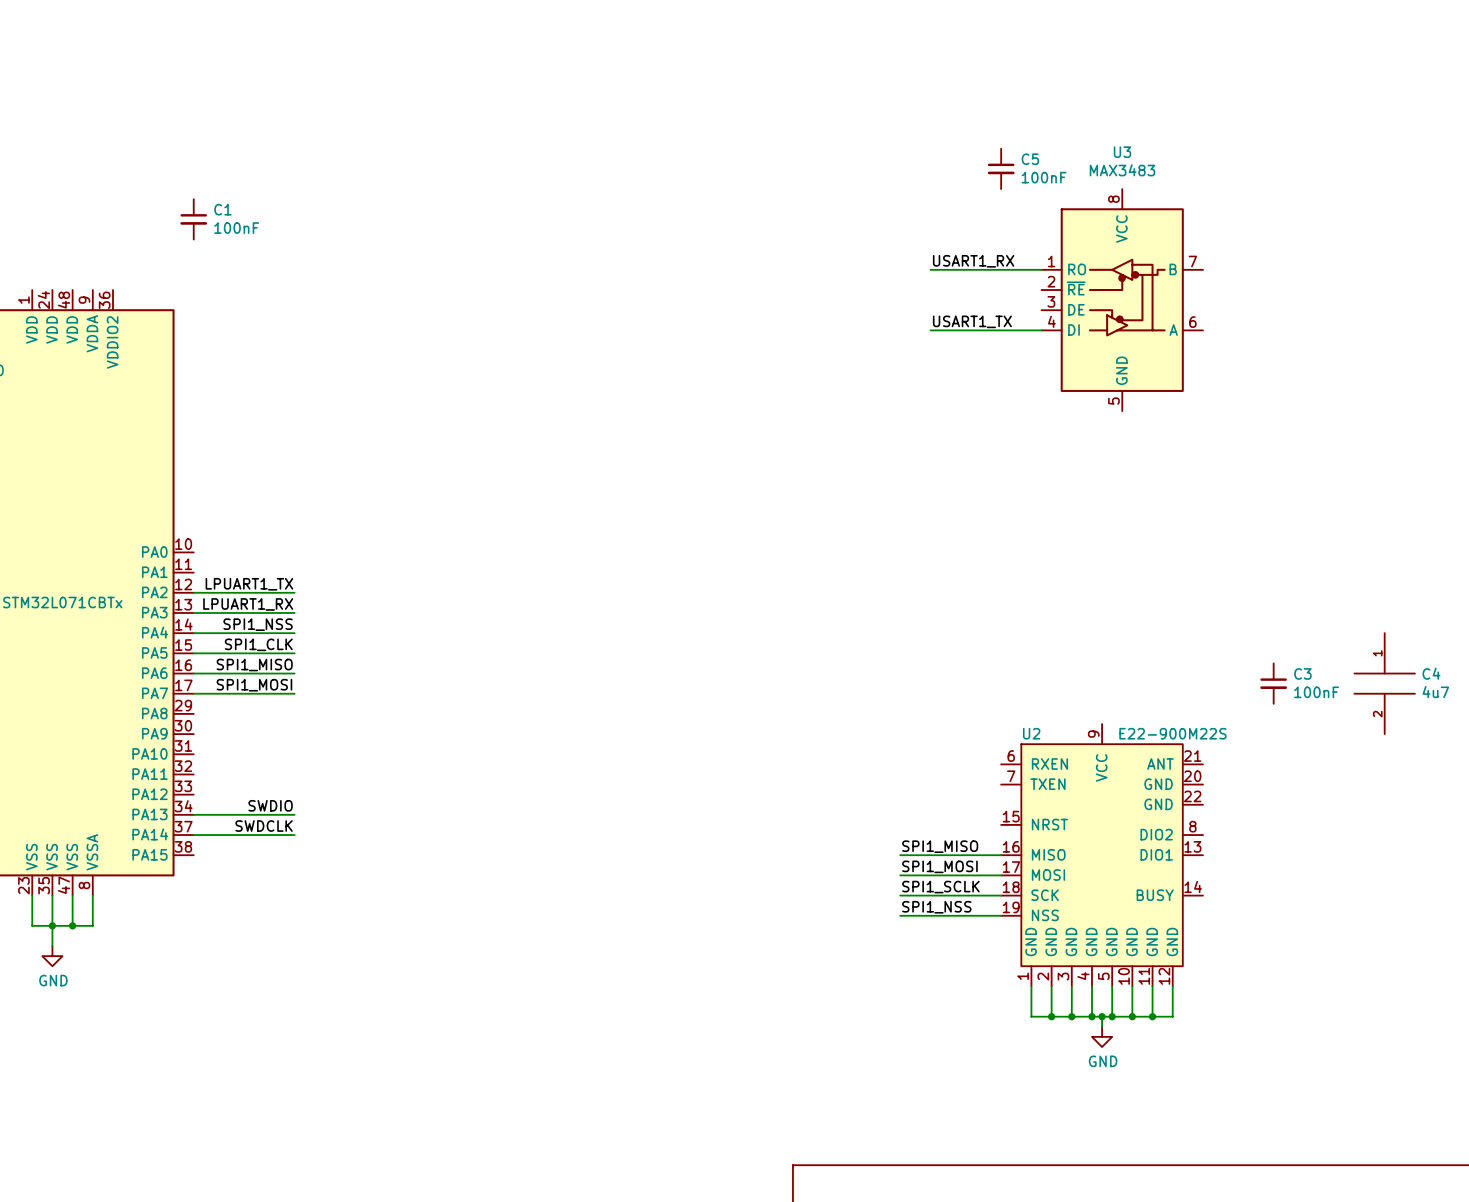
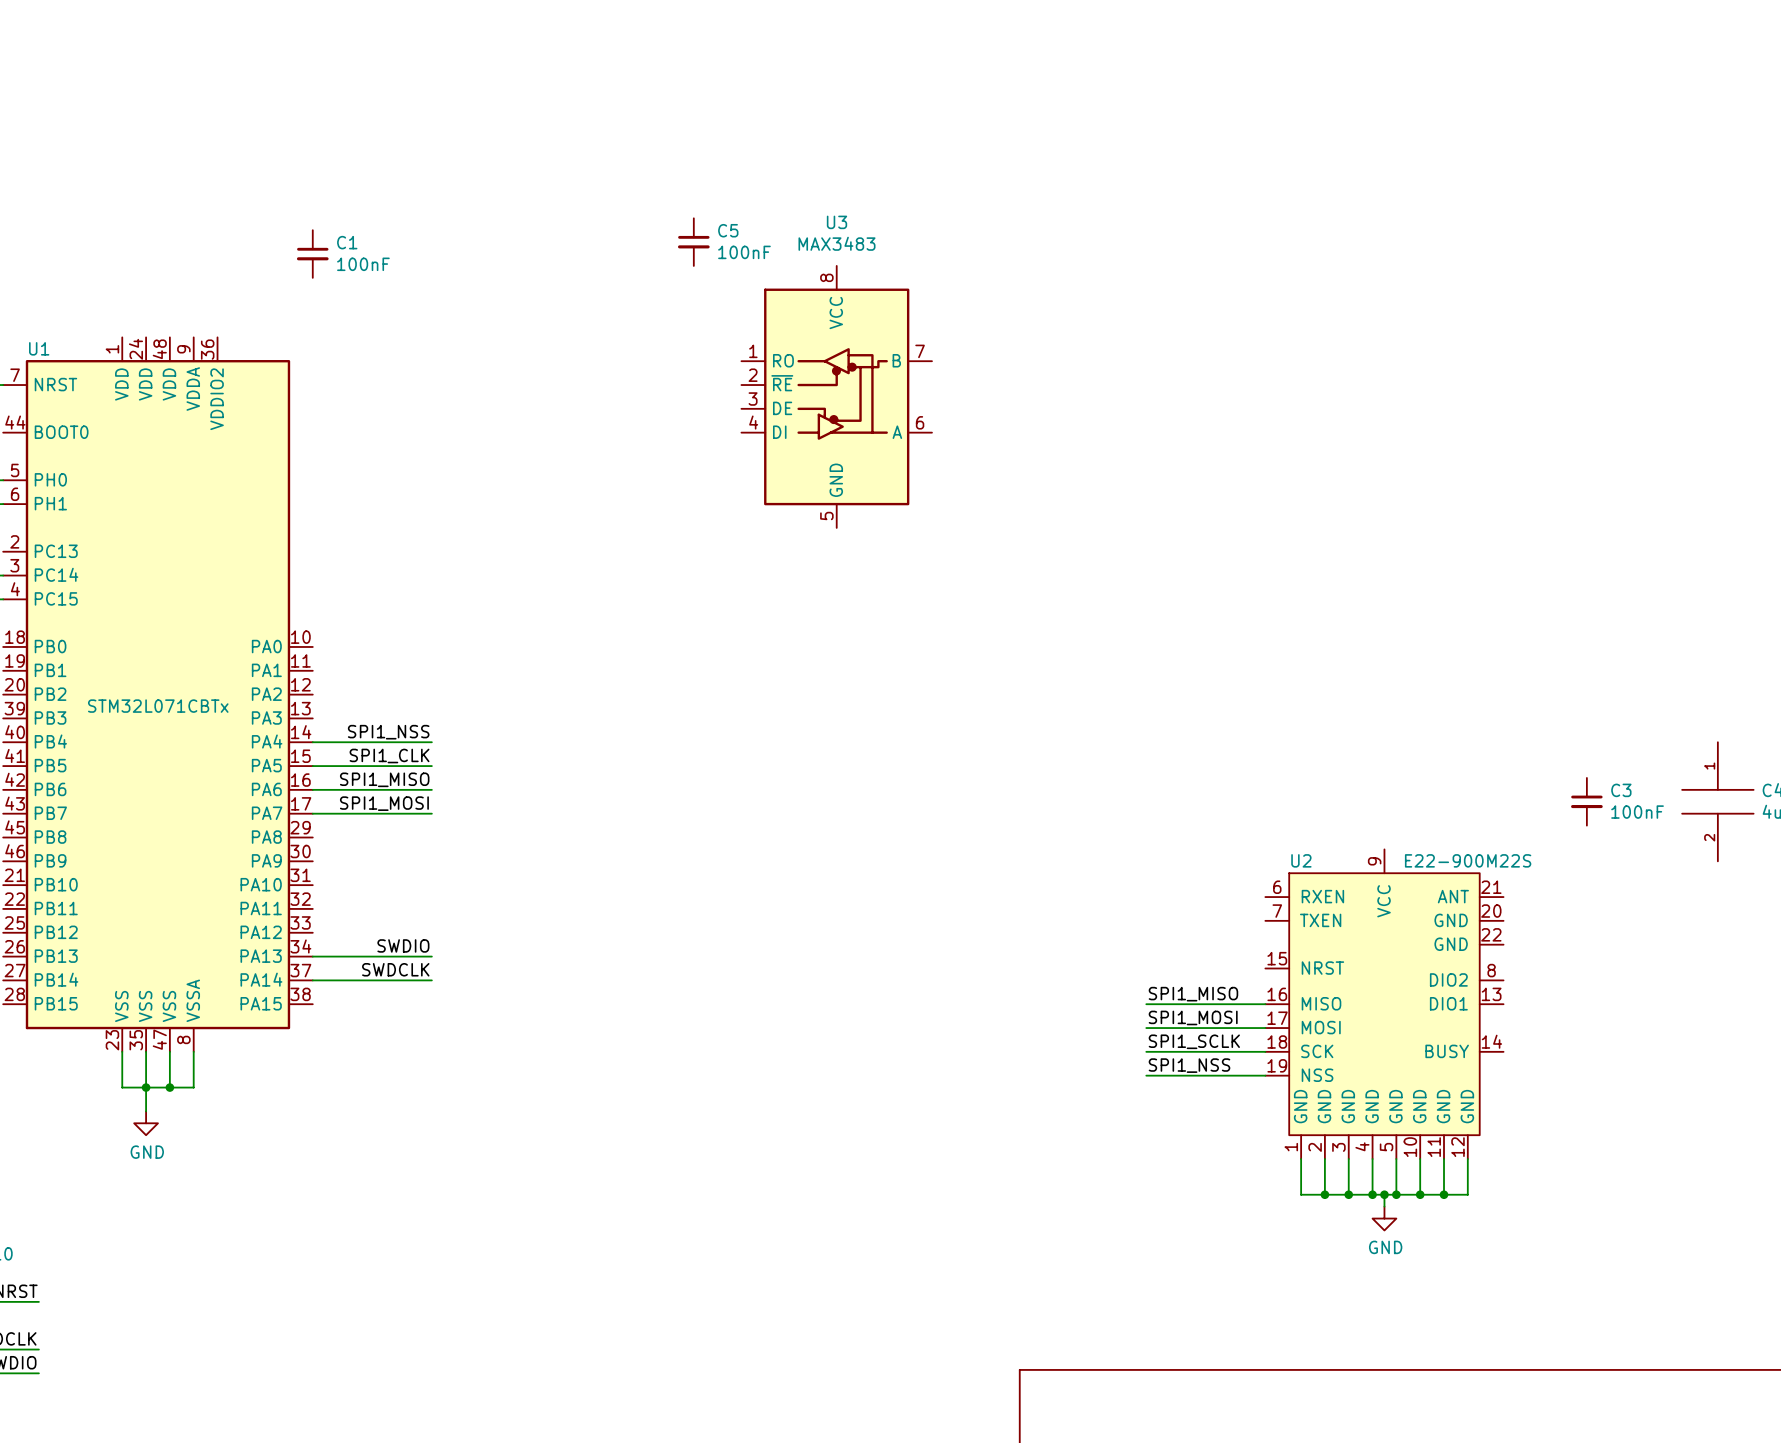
C5 position: (1001, 168) -> (693, 242)
label: USART1_RX (973, 261) -> none
wire: (930, 269) (1041, 269) -> none
U3 position: (1122, 300) -> (836, 396)
label: USART1_TX (972, 321) -> none
wire: (930, 330) (1041, 330) -> none
label: LPUART1_TX (249, 584) -> none
wire: (193, 592) (294, 592) -> none
label: LPUART1_RX (248, 604) -> none
wire: (193, 612) (294, 612) -> none

